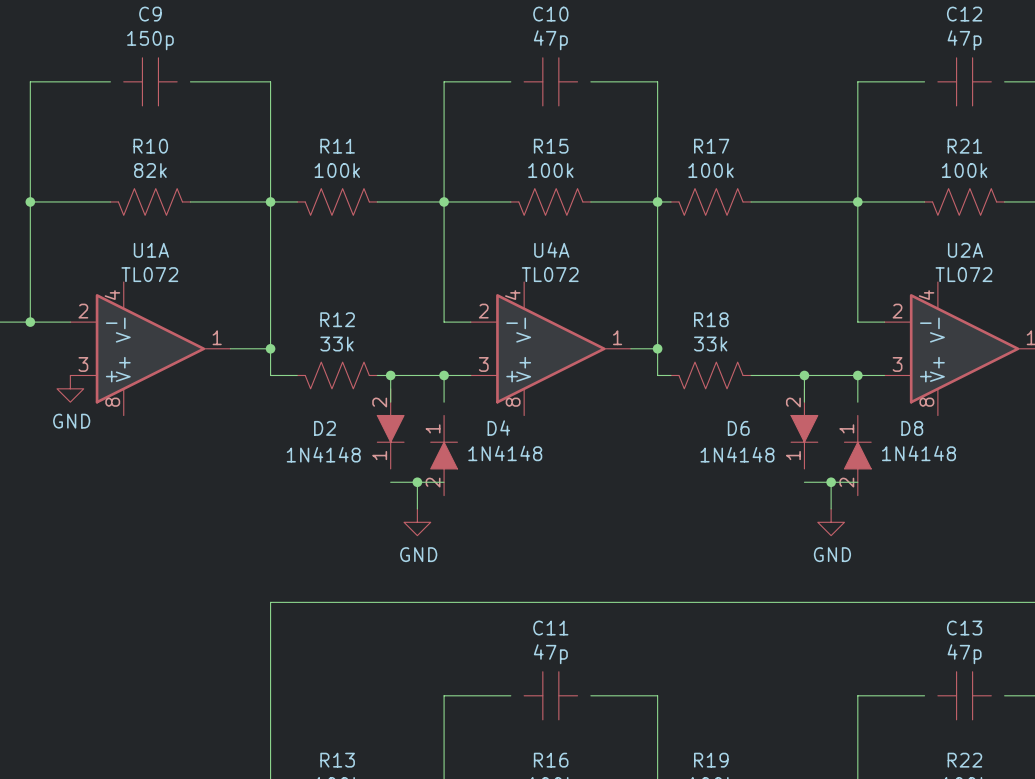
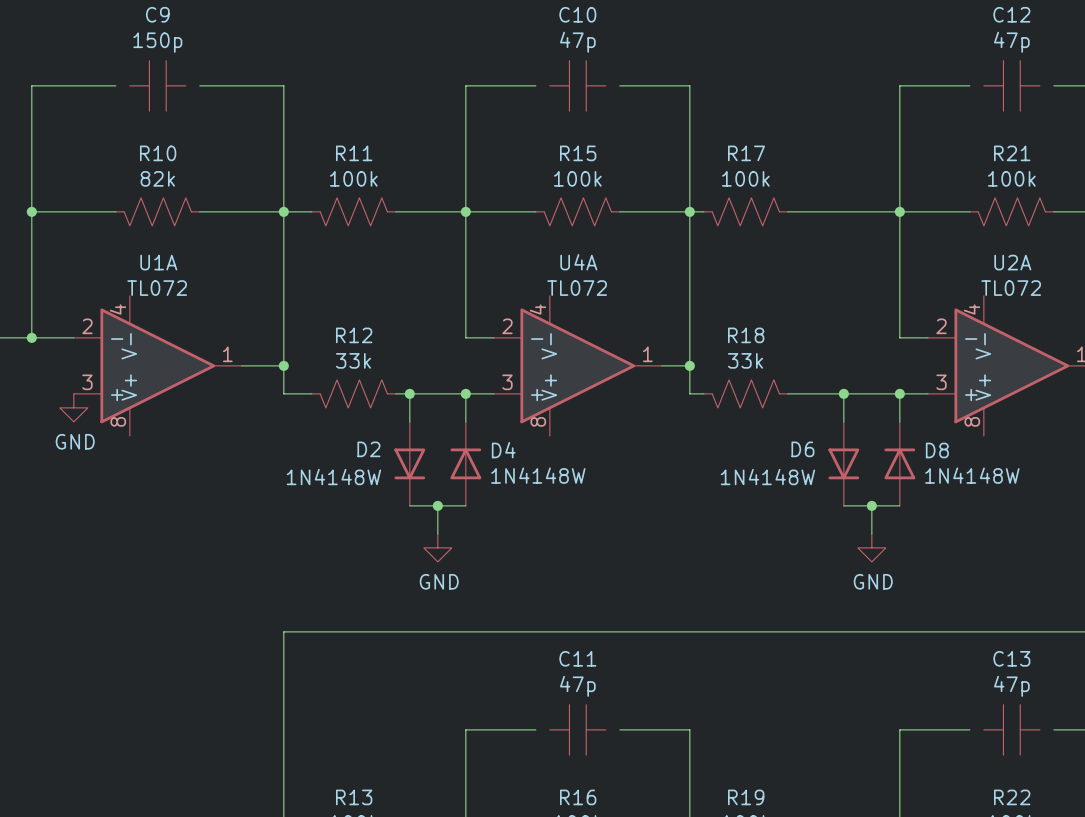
D2 symbol: [377, 388, 405, 469] -> [394, 421, 426, 506]
D6 symbol: [791, 388, 818, 469] -> [828, 421, 860, 506]
D4 symbol: [430, 415, 458, 496] -> [450, 421, 482, 506]
D8 symbol: [844, 415, 872, 496] -> [884, 421, 916, 506]
D2 name position: D2 (325, 428) -> D2 (368, 449)
D4 name position: D4 (498, 428) -> D4 (503, 450)
D6 name position: D6 (738, 428) -> D6 (802, 449)
D8 name position: D8 (912, 428) -> D8 (937, 450)
D4 value: 1N4148 (505, 453) -> 1N4148W (538, 475)
D8 value: 1N4148 (918, 453) -> 1N4148W (972, 475)
D2 value: 1N4148 (323, 454) -> 1N4148W (333, 477)
D6 value: 1N4148 (737, 454) -> 1N4148W (767, 477)

